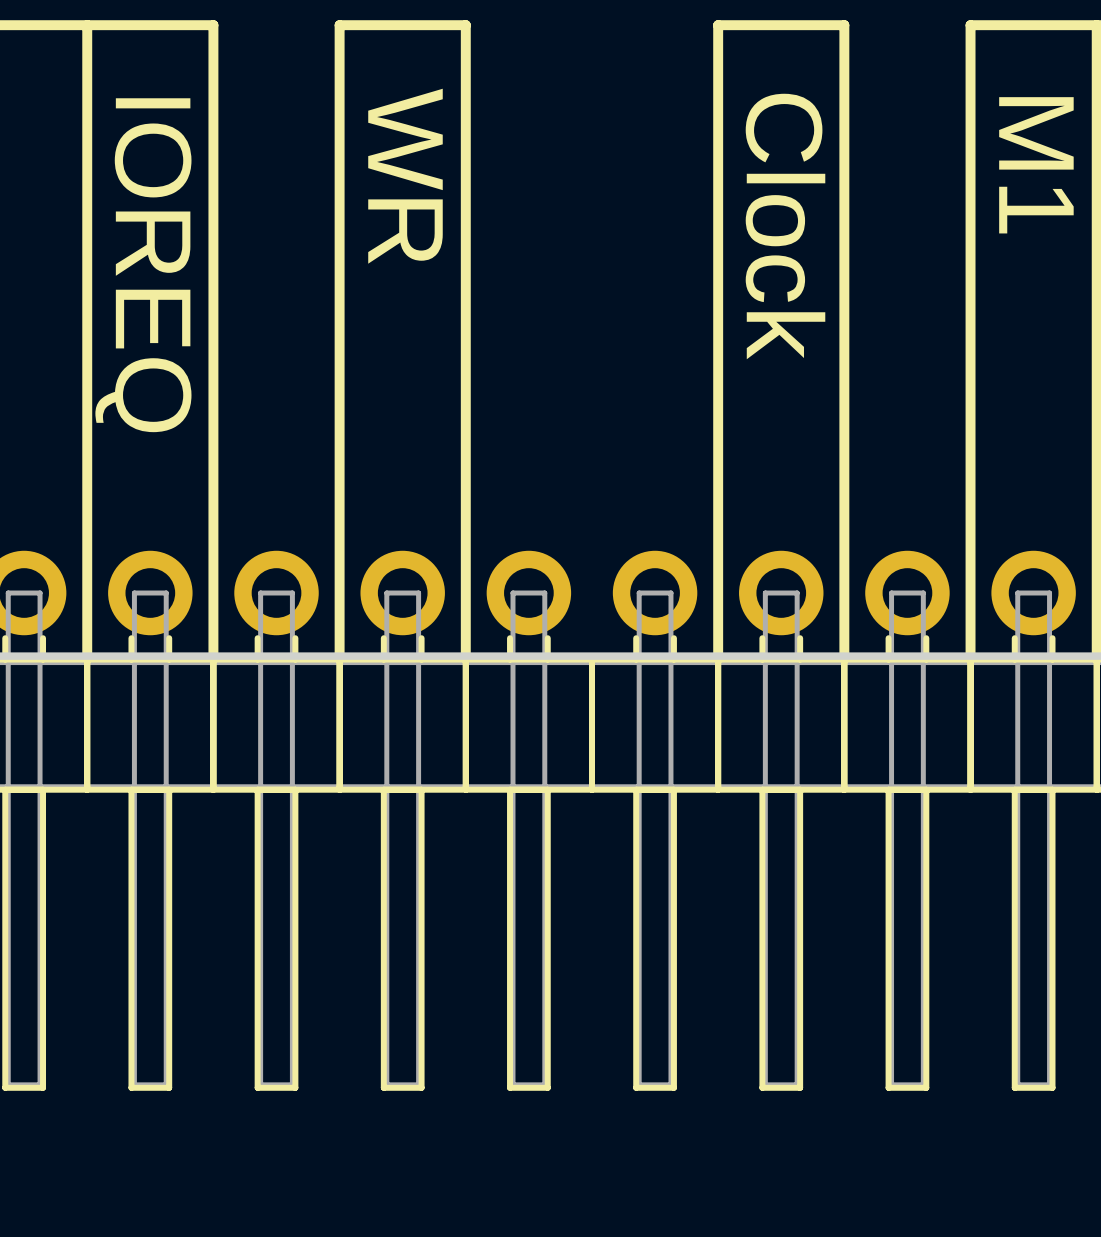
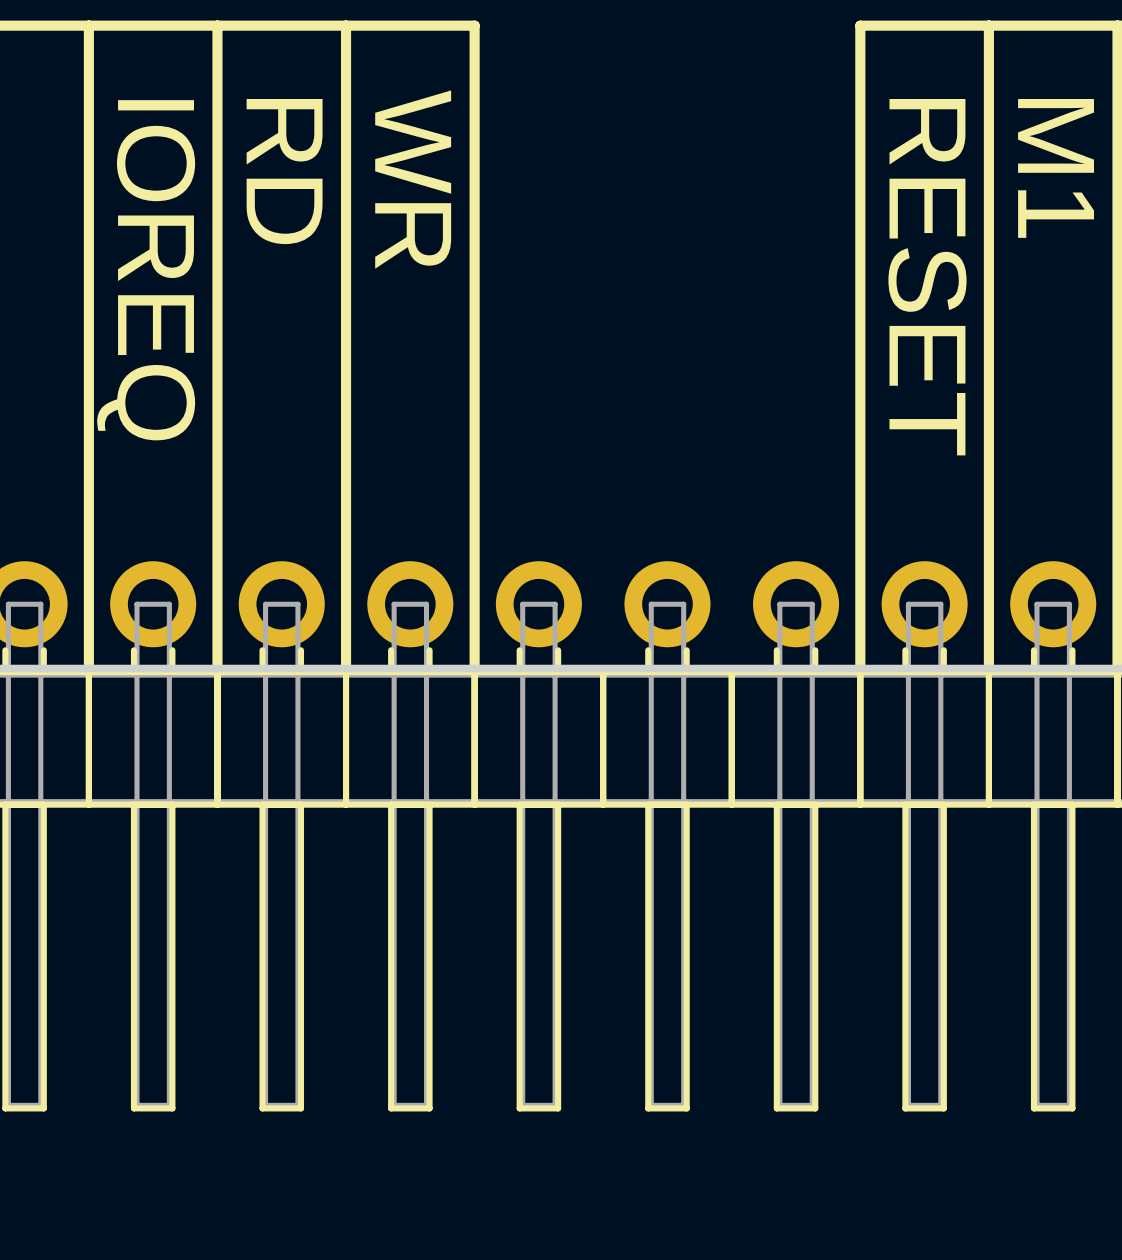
line: none -> (217, 25) (346, 25)
line: (844, 25) (718, 25) (718, 656) -> (860, 25) (988, 25)
text: none -> RD (284, 171)
text: Clock (785, 226) -> none
text: none -> RESET (927, 277)

